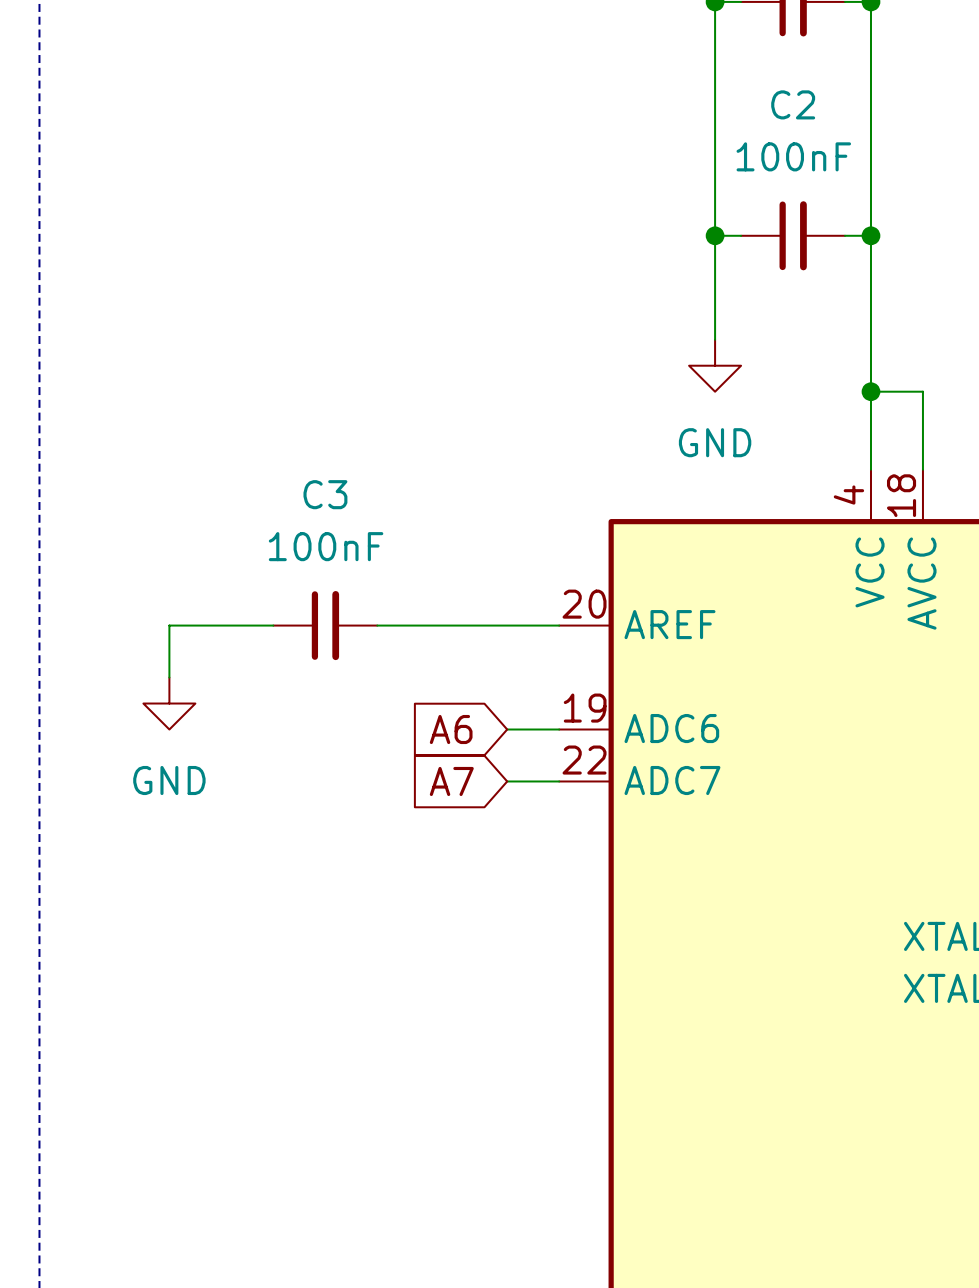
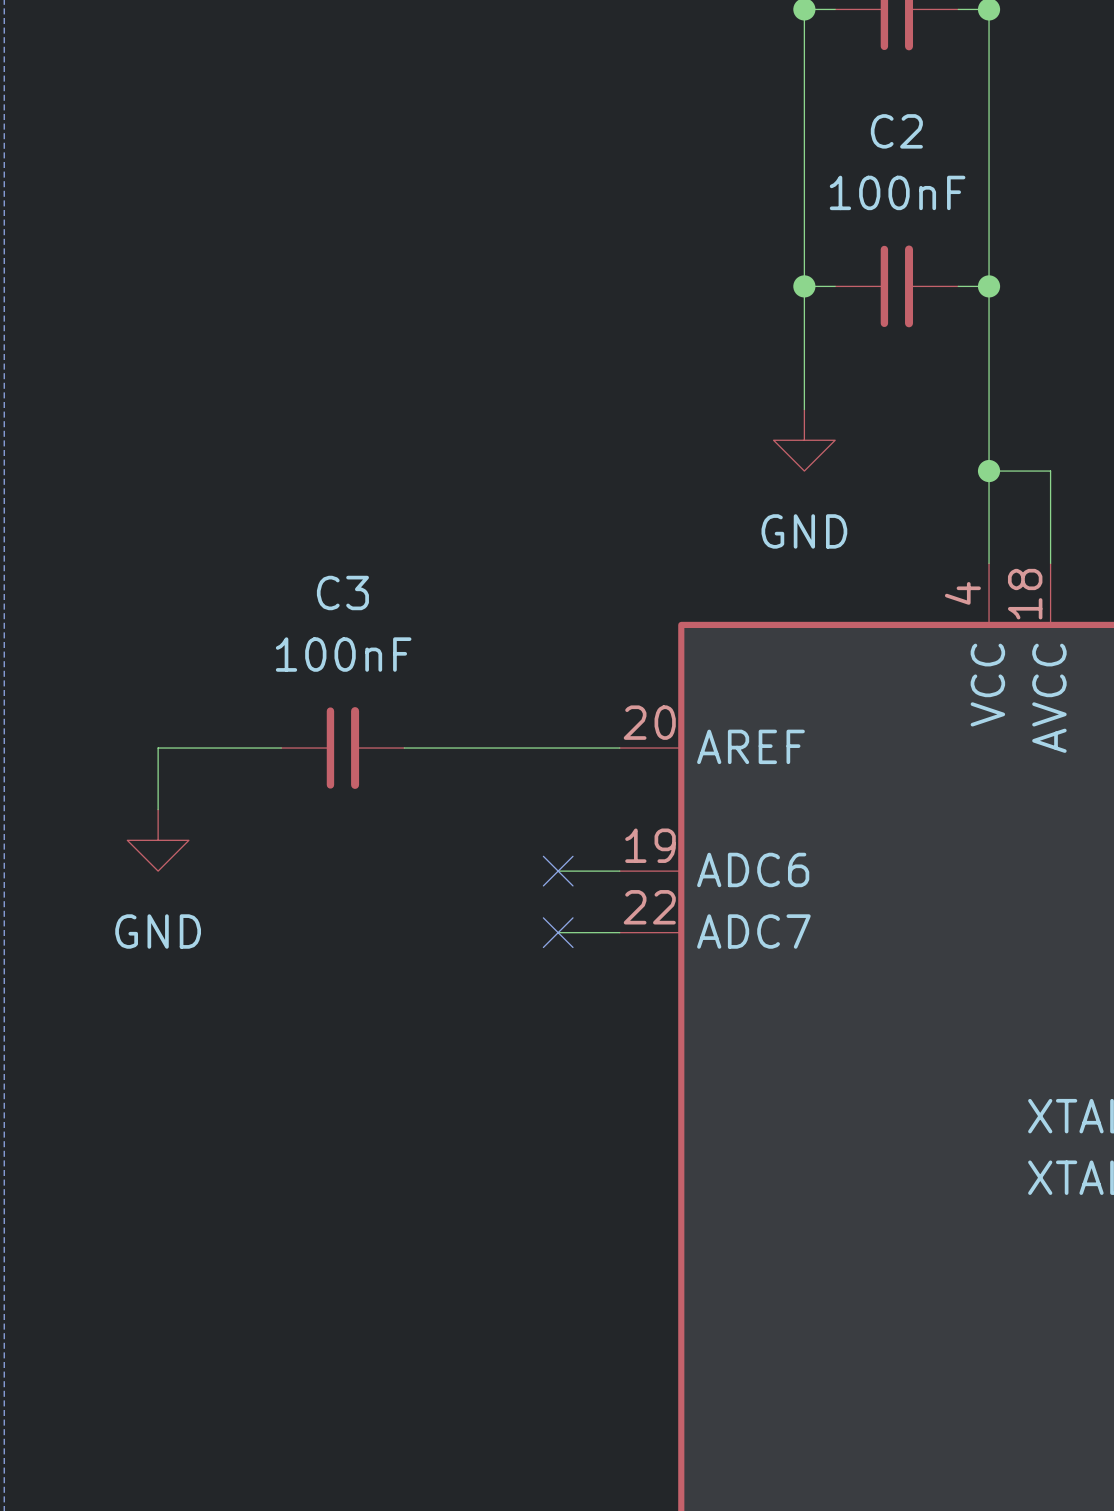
global label: A6 (451, 729) -> none
no-connect mark: none -> (558, 871)
global label: A7 (451, 781) -> none
no-connect mark: none -> (558, 932)

